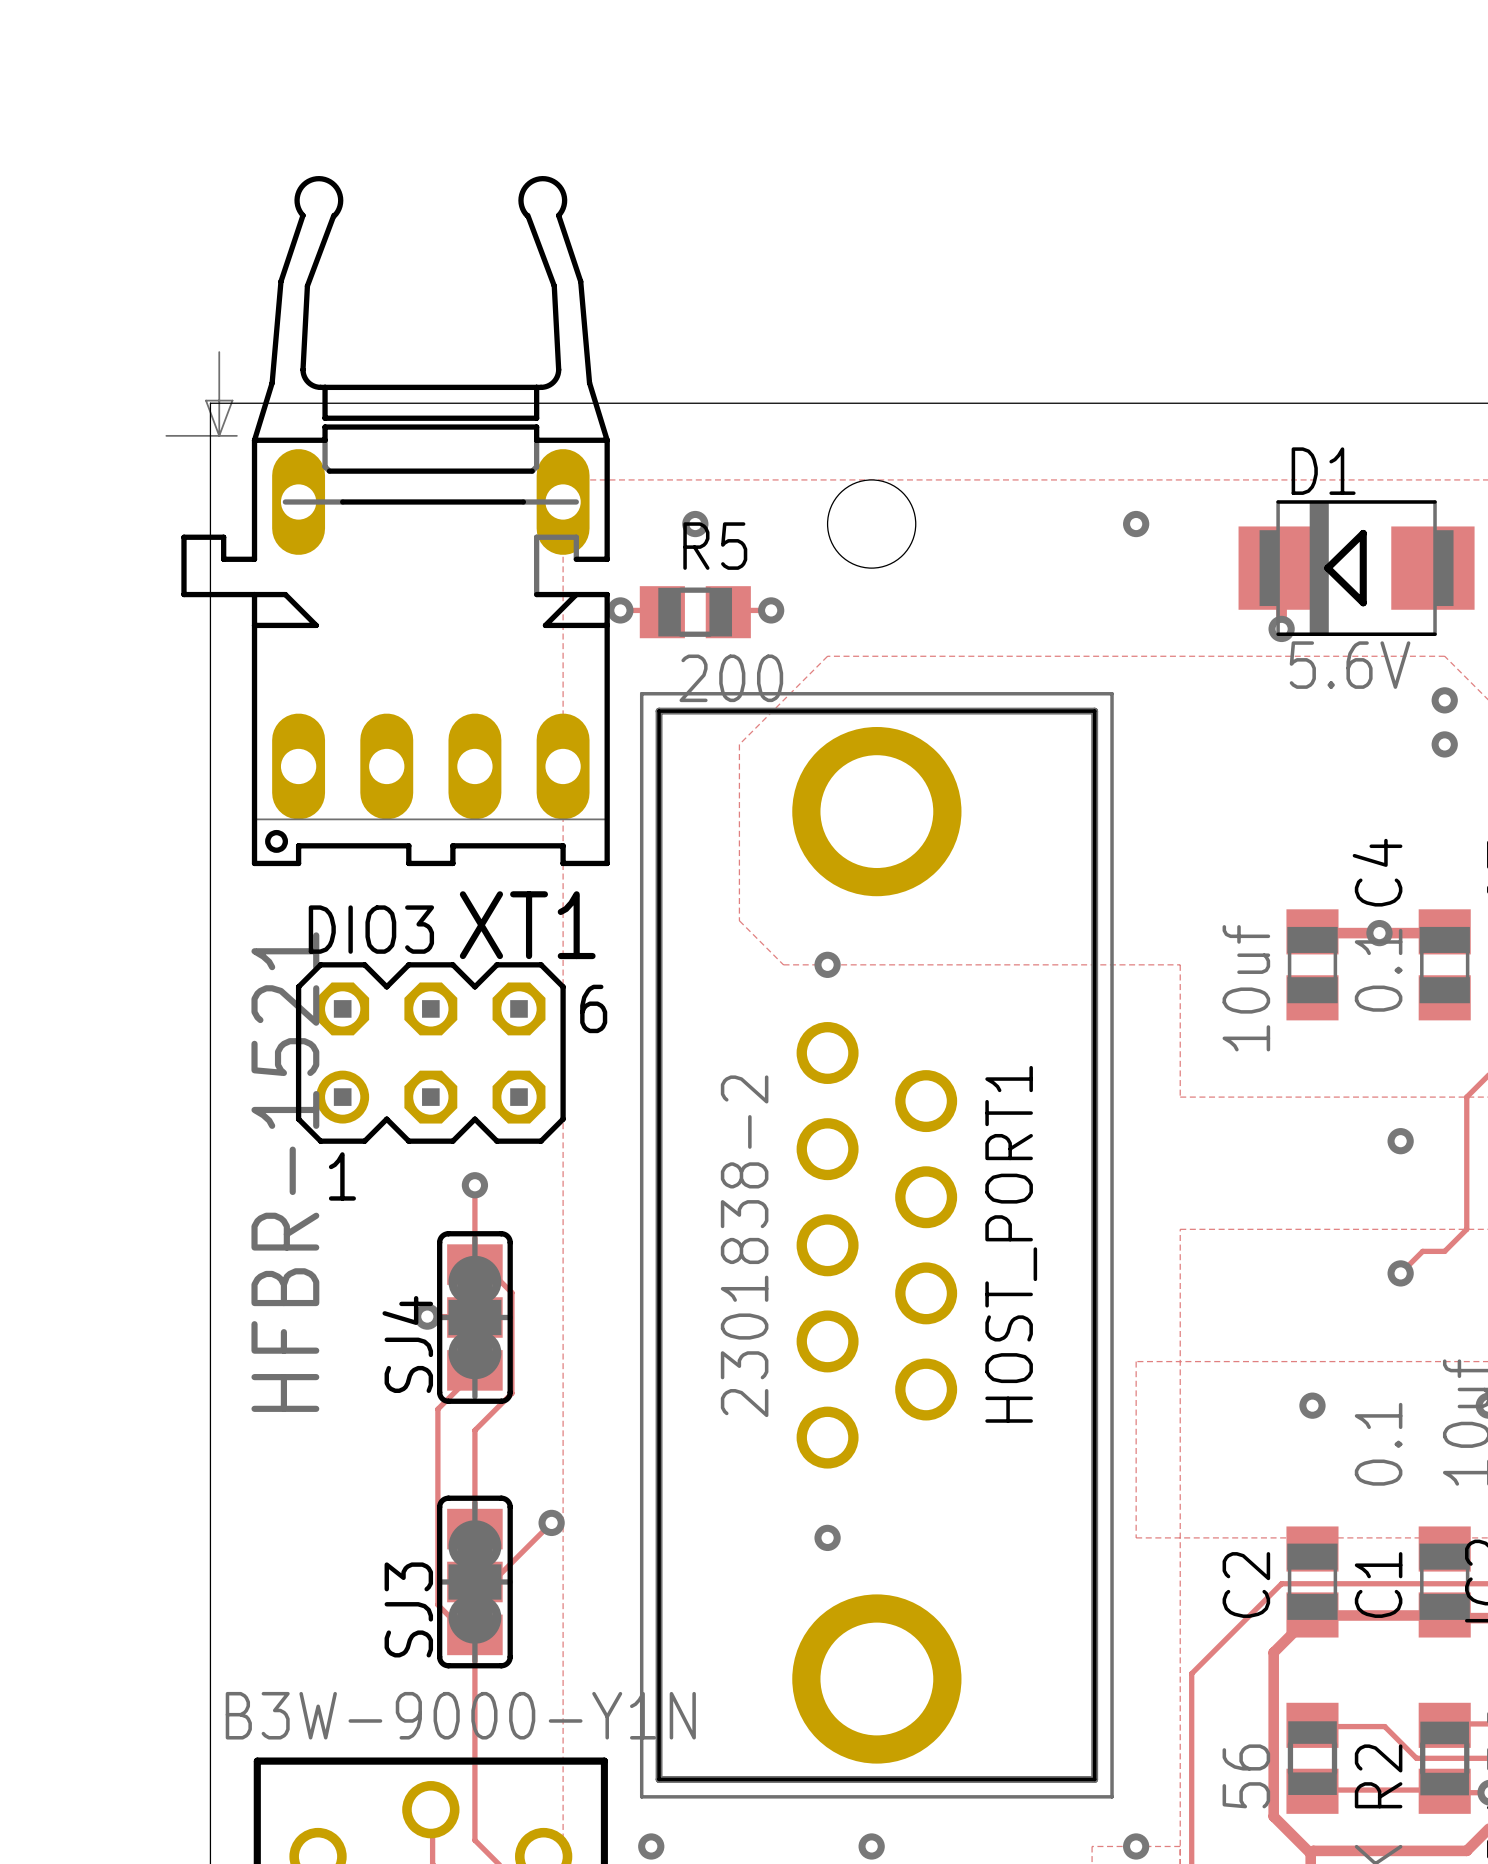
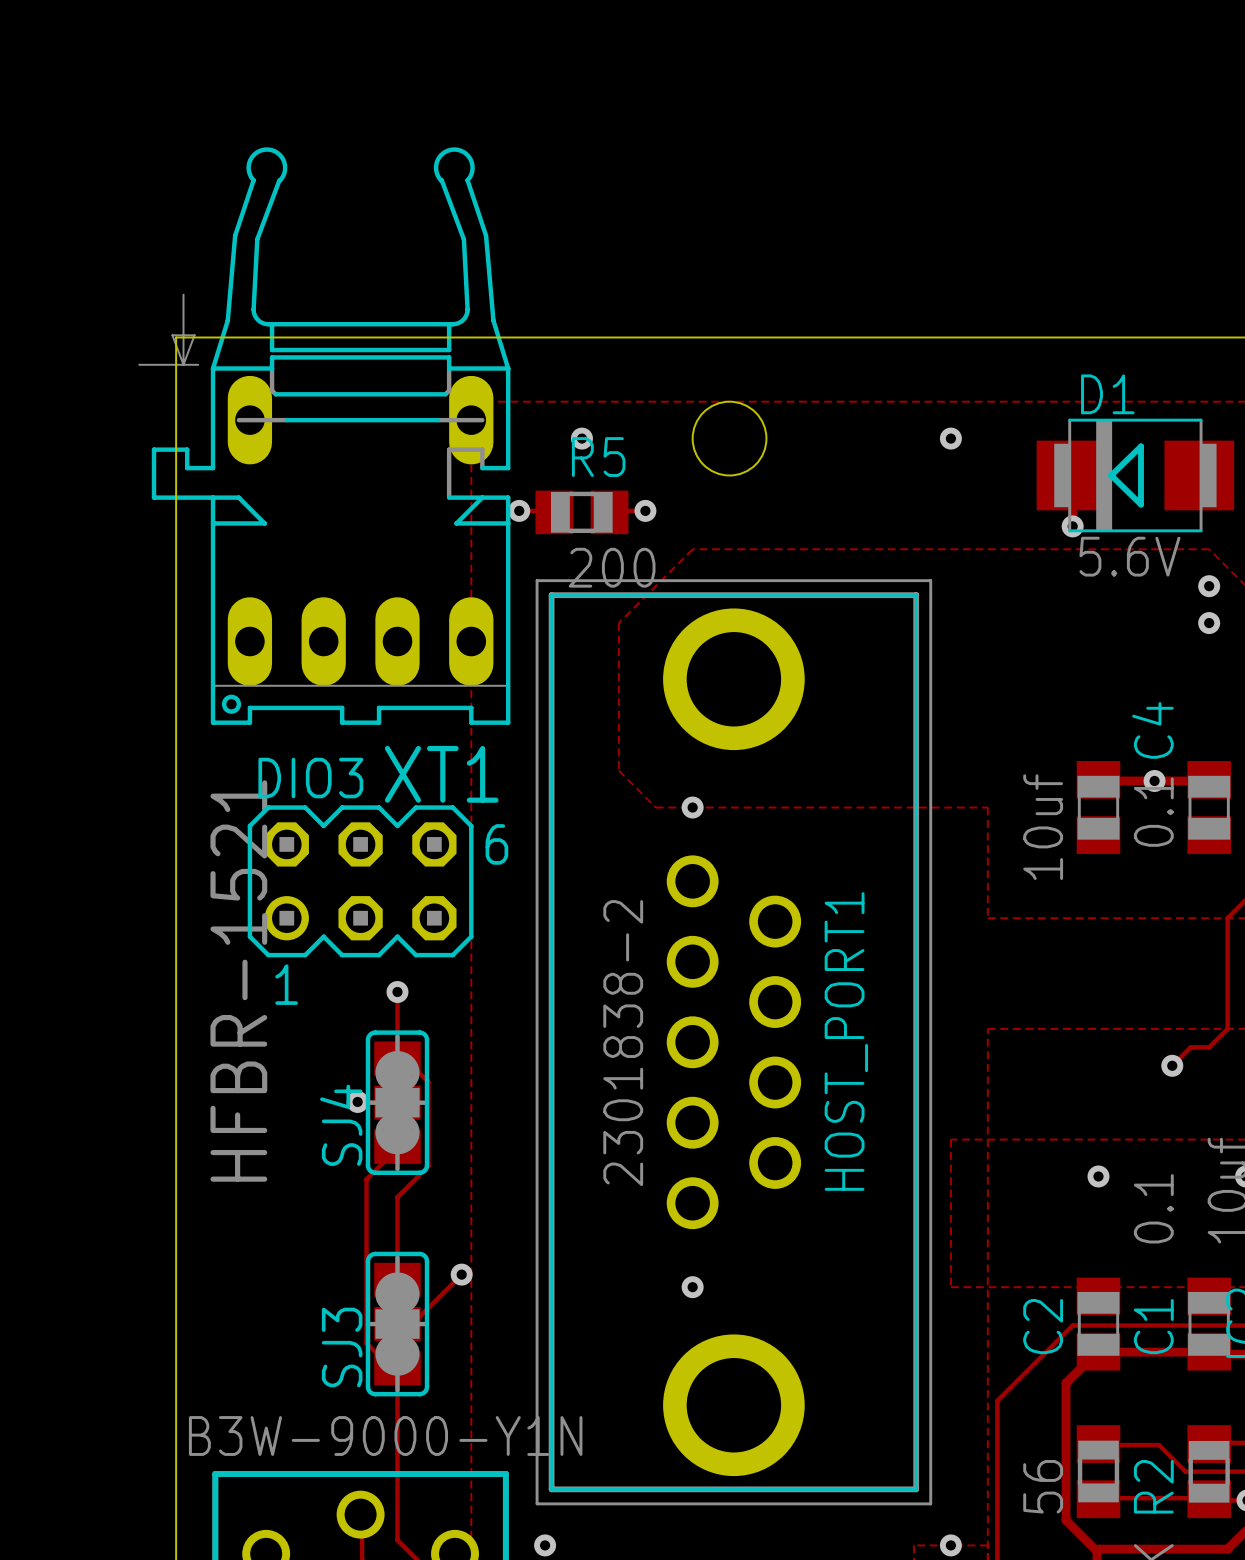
via: (1400, 1141) -> none
via: (871, 1846) -> none

